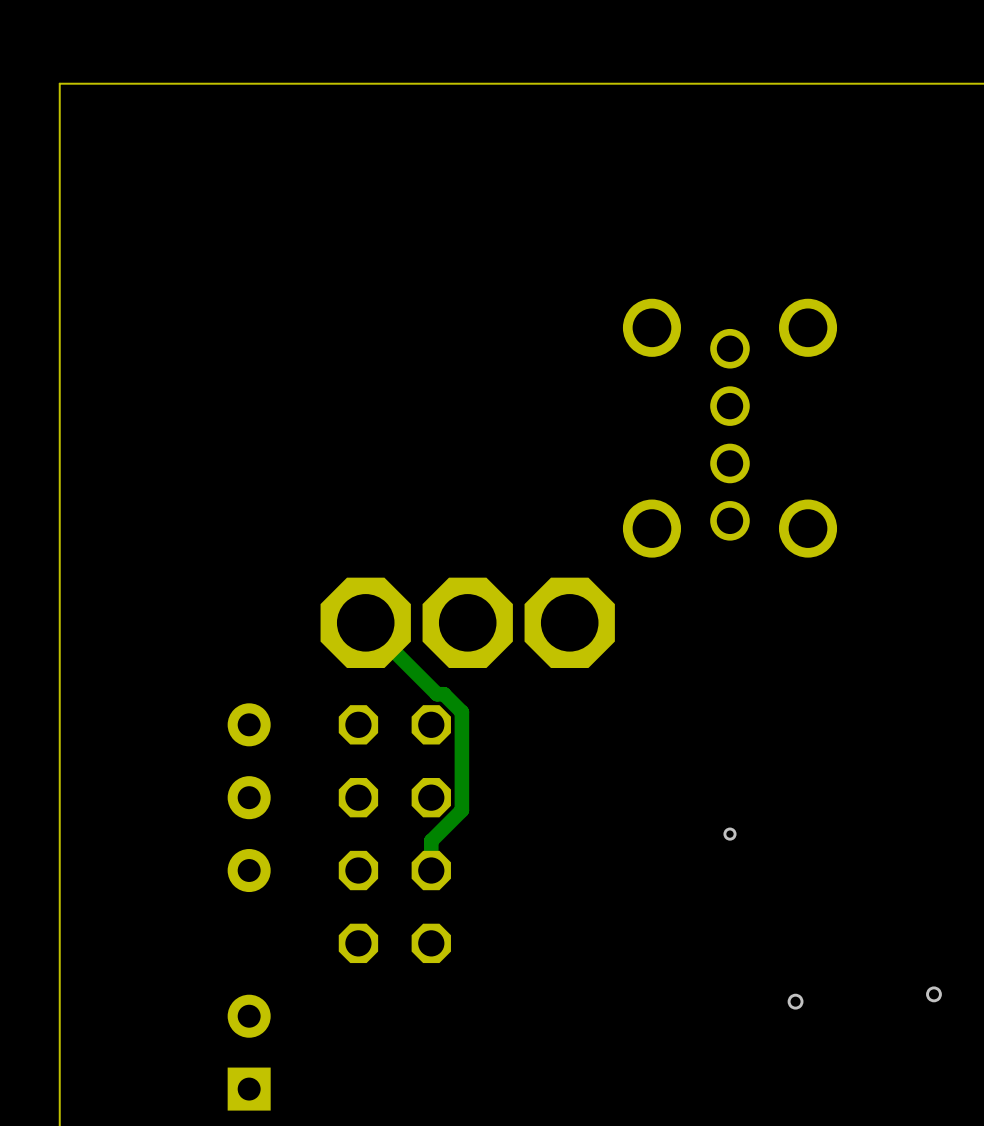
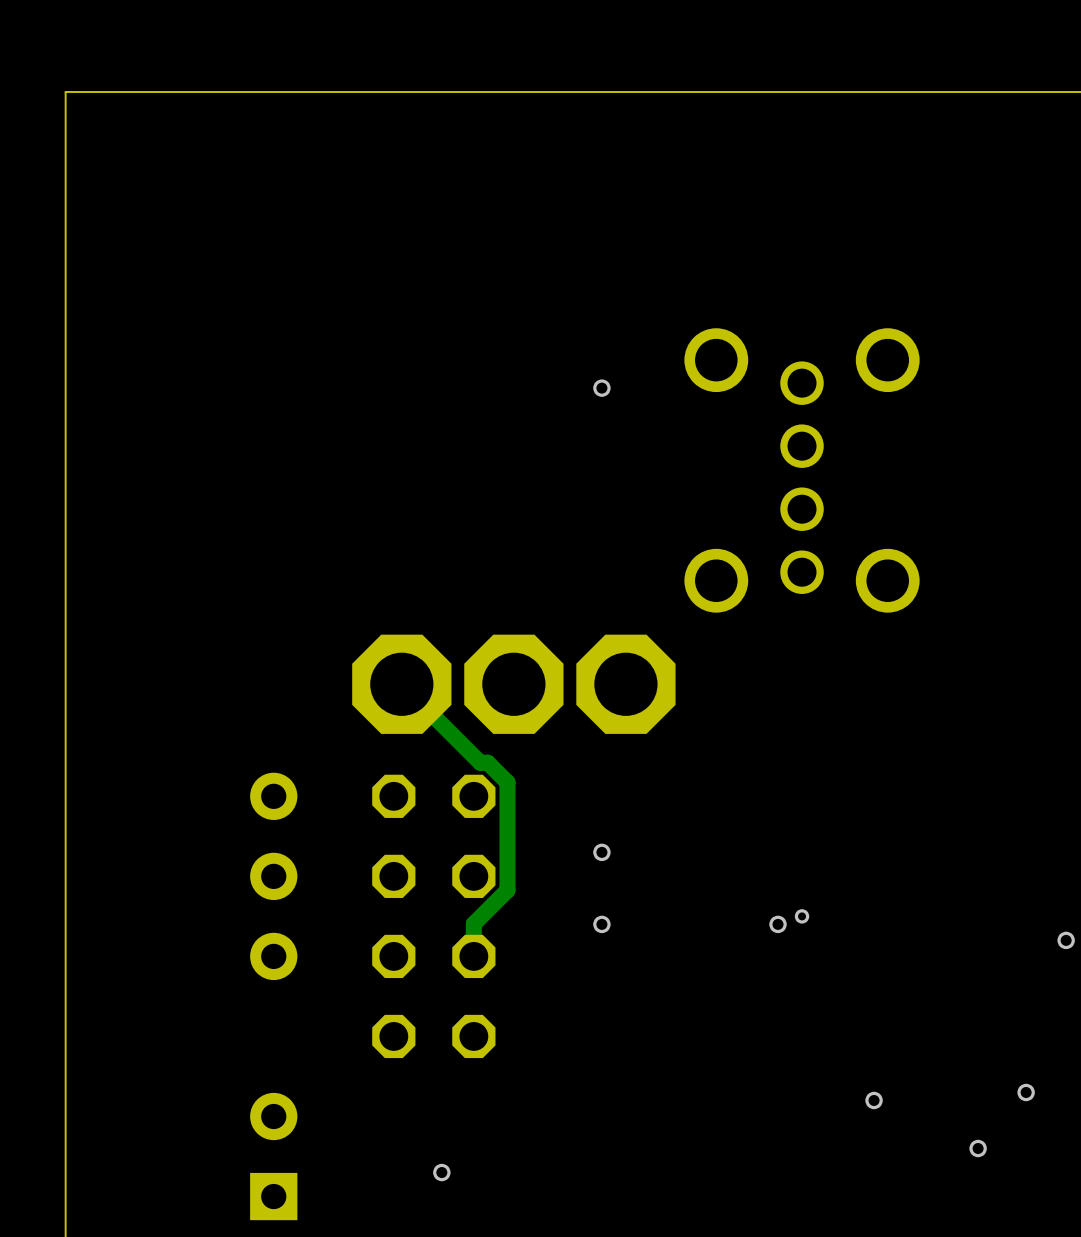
via: none -> (601, 388)
via: none -> (601, 852)
via: none -> (601, 924)
via: none -> (778, 924)
via: none -> (1066, 940)
via: none -> (978, 1148)
via: none -> (441, 1172)

